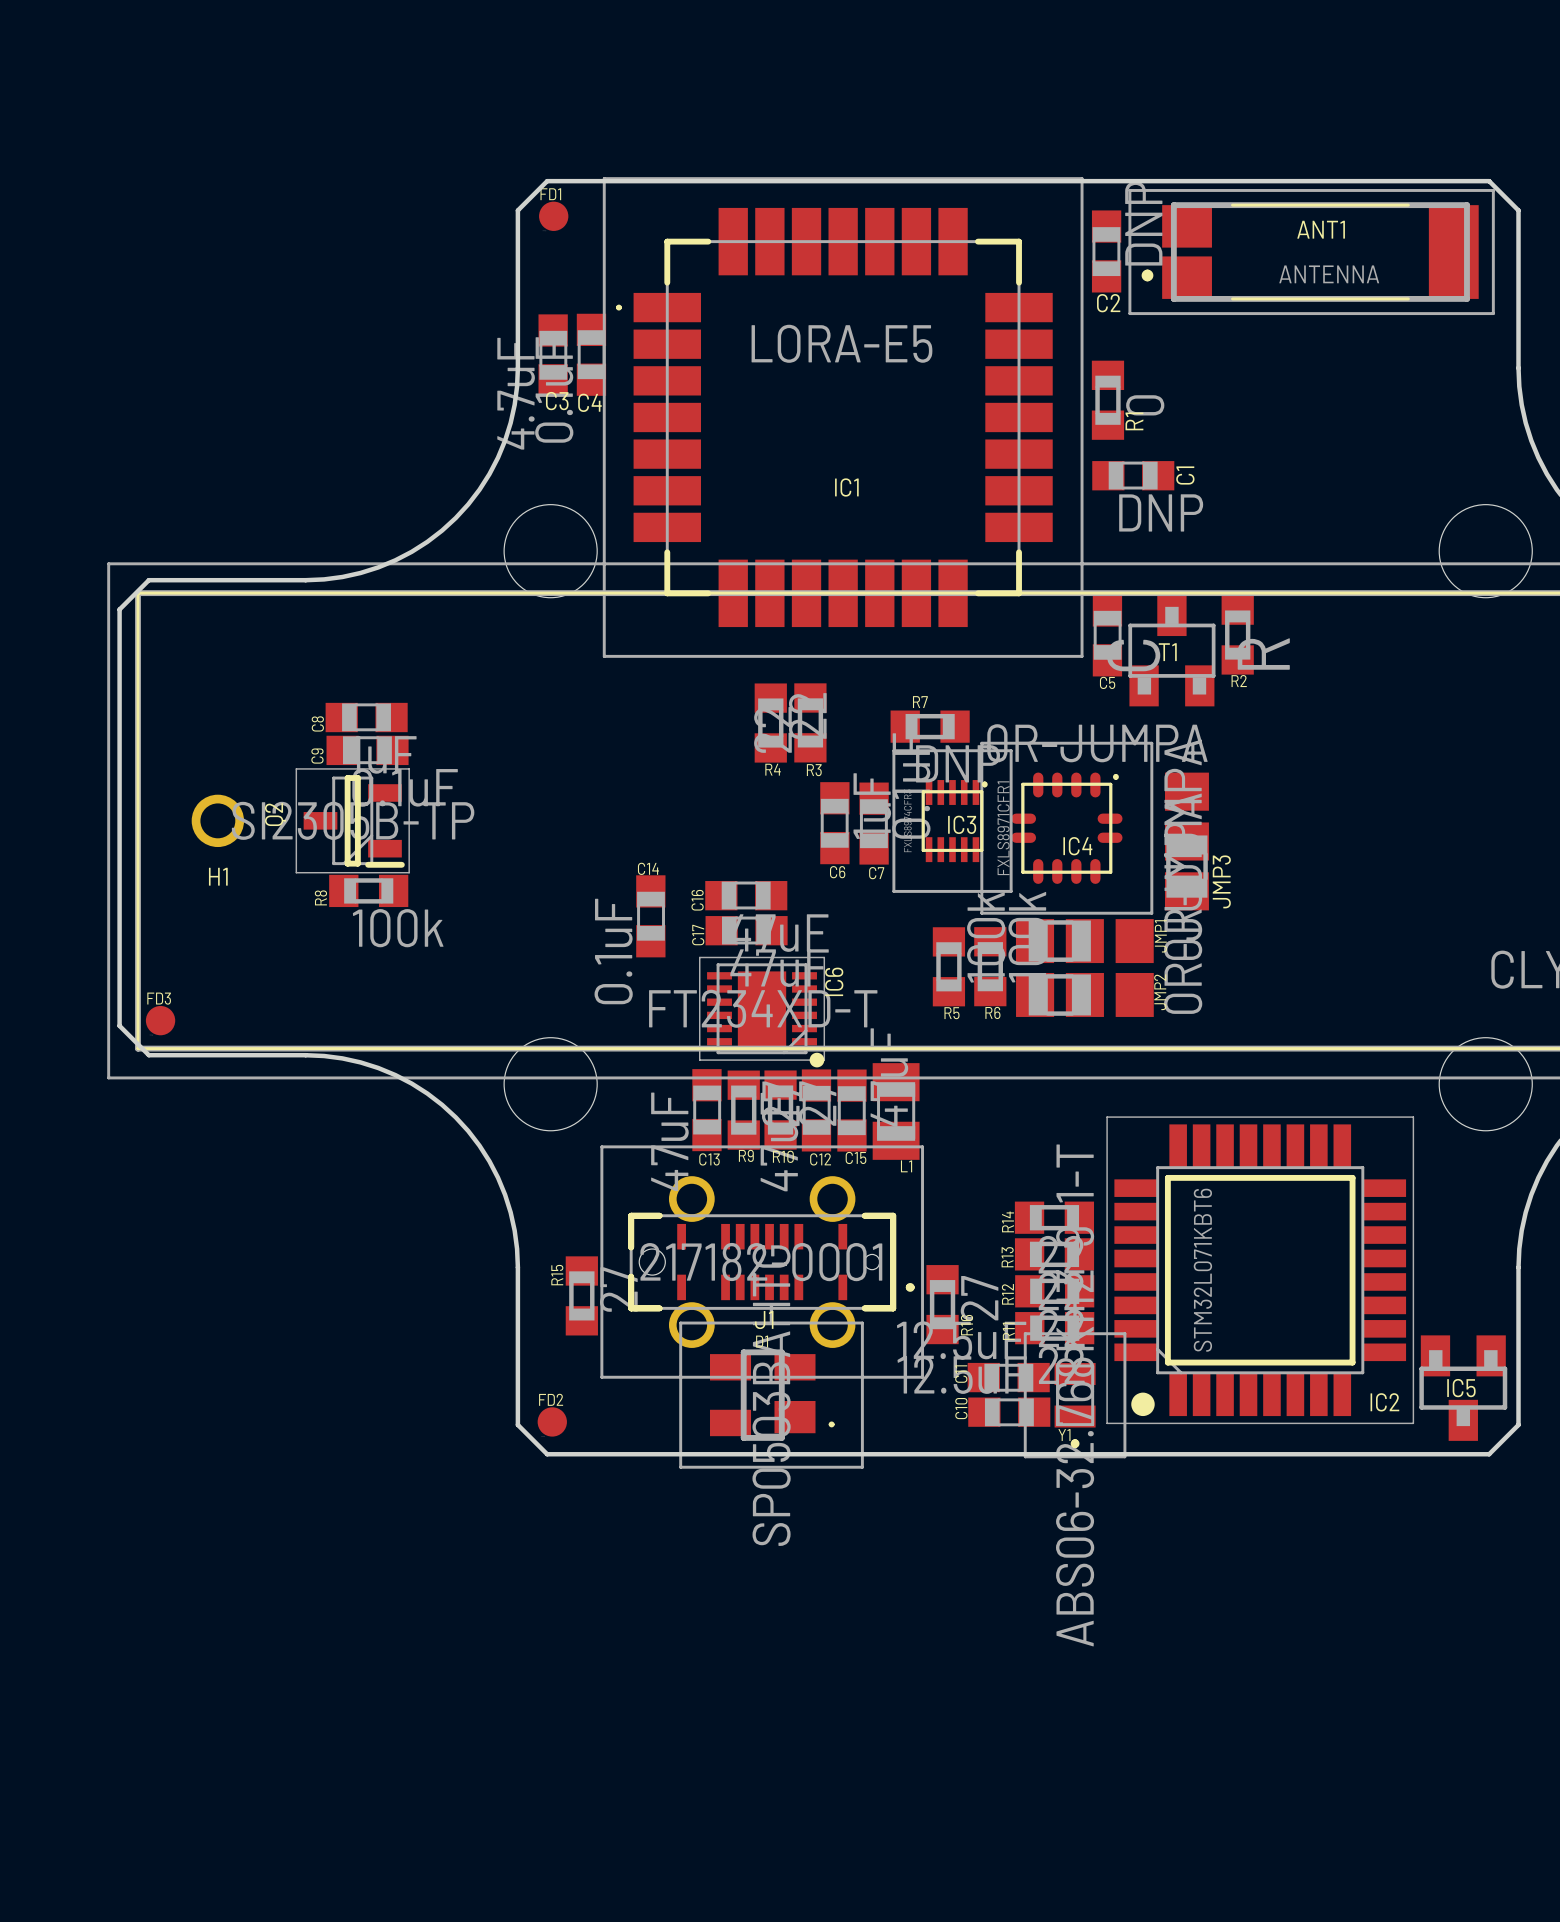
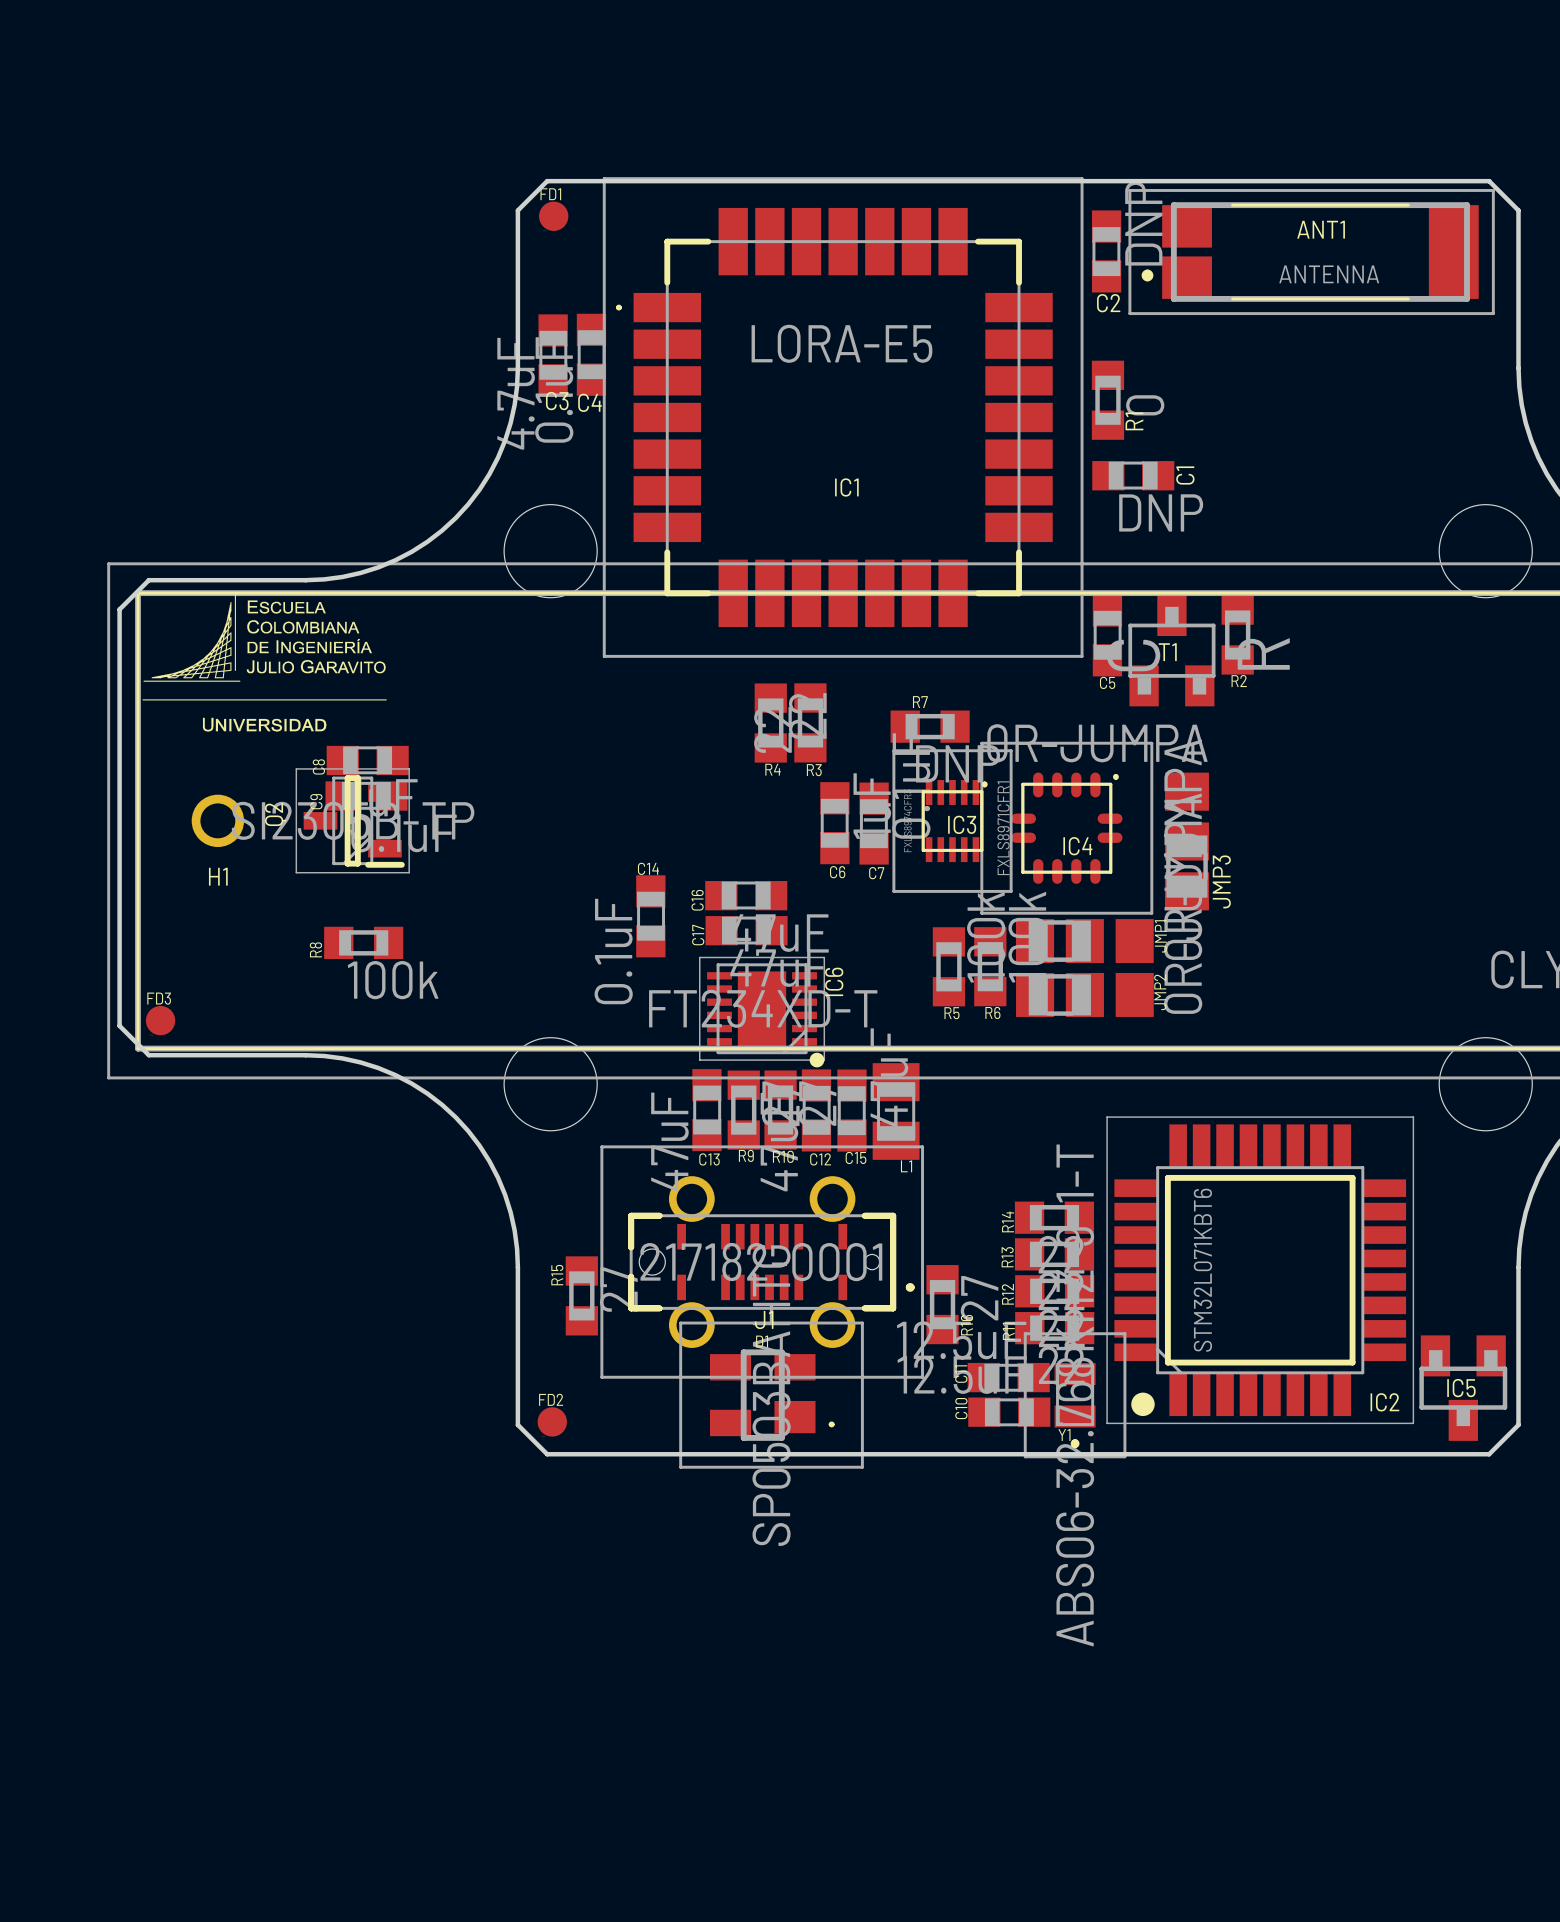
drawing: none -> [142, 594, 387, 732]
C8 position: (366, 717) -> (367, 760)
C9 position: (367, 750) -> (366, 796)
R8 position: (368, 890) -> (363, 942)

